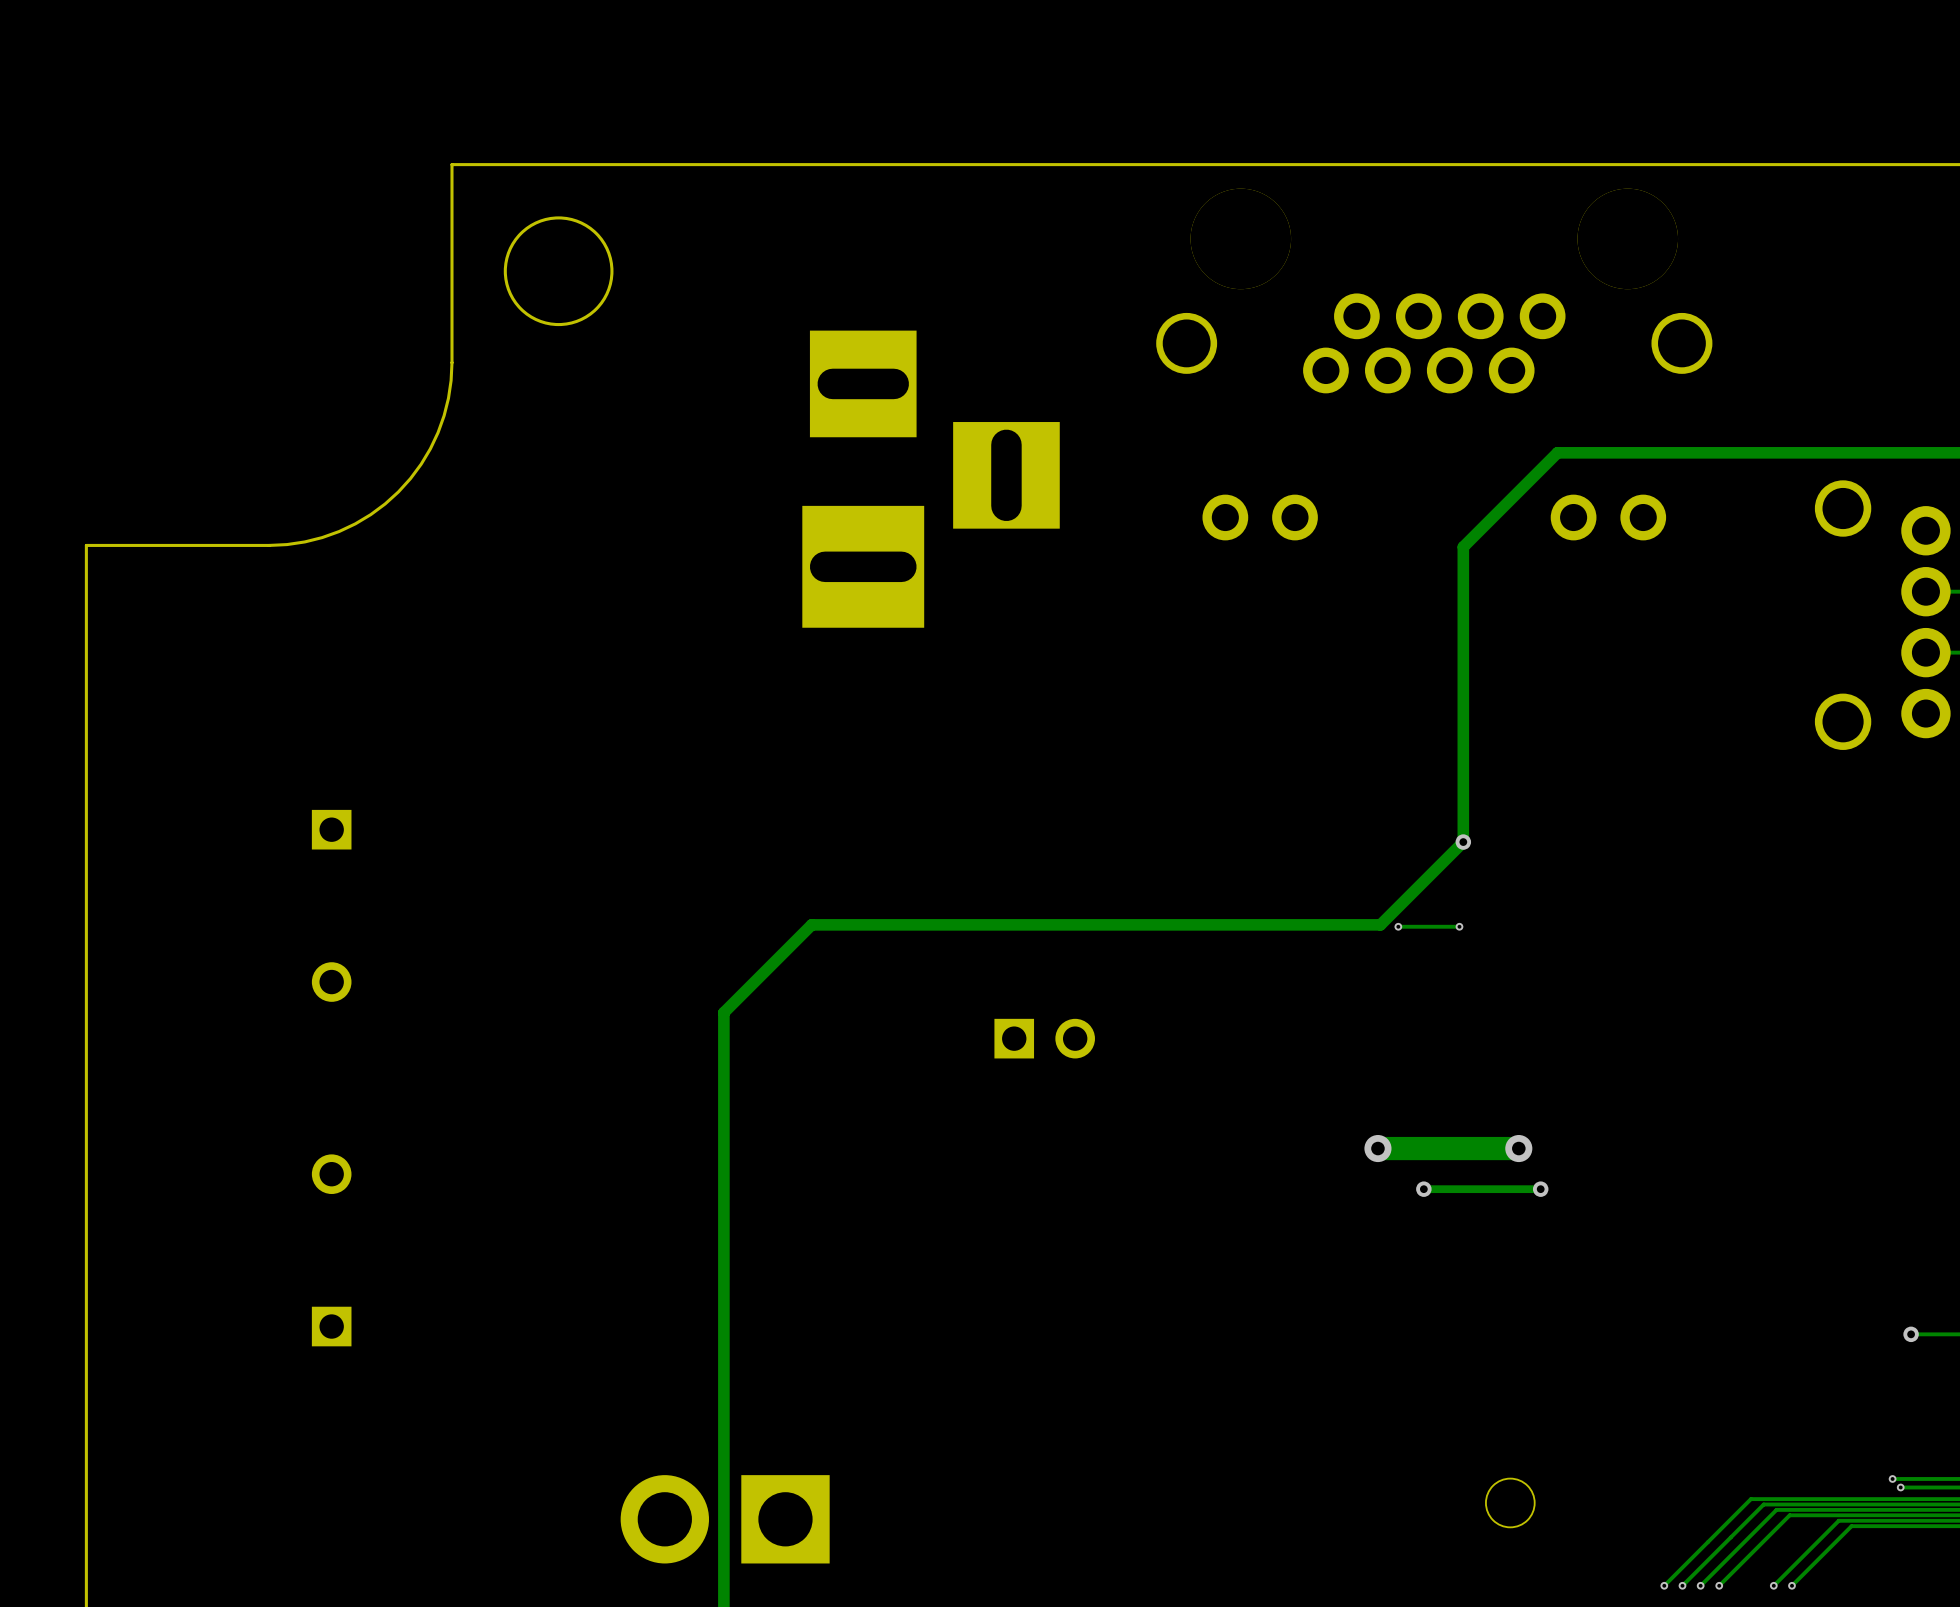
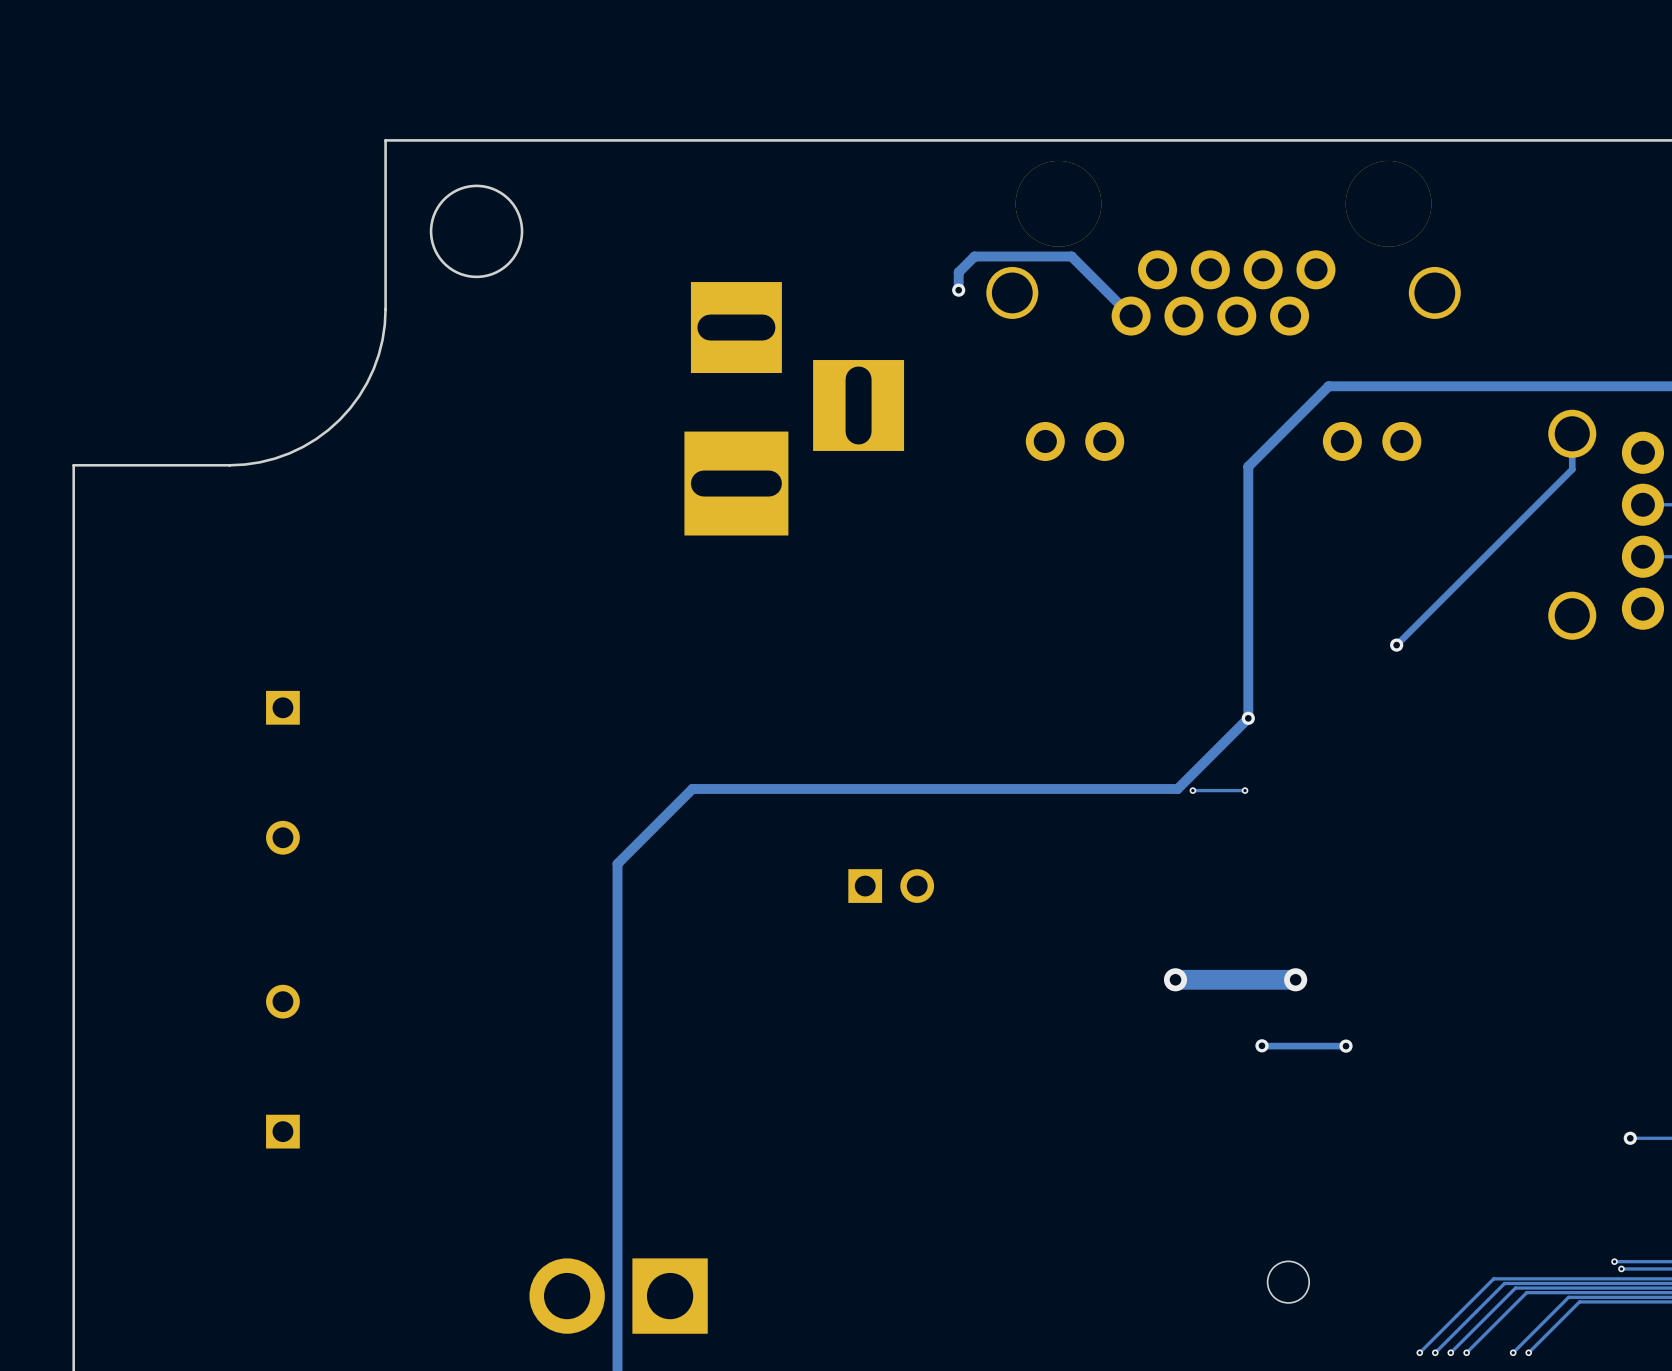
track: none -> (958, 290) (958, 272) (974, 256) (1071, 256) (1131, 316)
via: none -> (958, 290)
track: none -> (1572, 433) (1572, 469) (1396, 645)
via: none -> (1396, 645)
via: (1423, 1189) -> none
track: (1540, 1189) (1423, 1189) -> none
via: (1540, 1189) -> none
via: none -> (1261, 1045)
track: none -> (1346, 1046) (1262, 1046)
via: none -> (1346, 1046)

